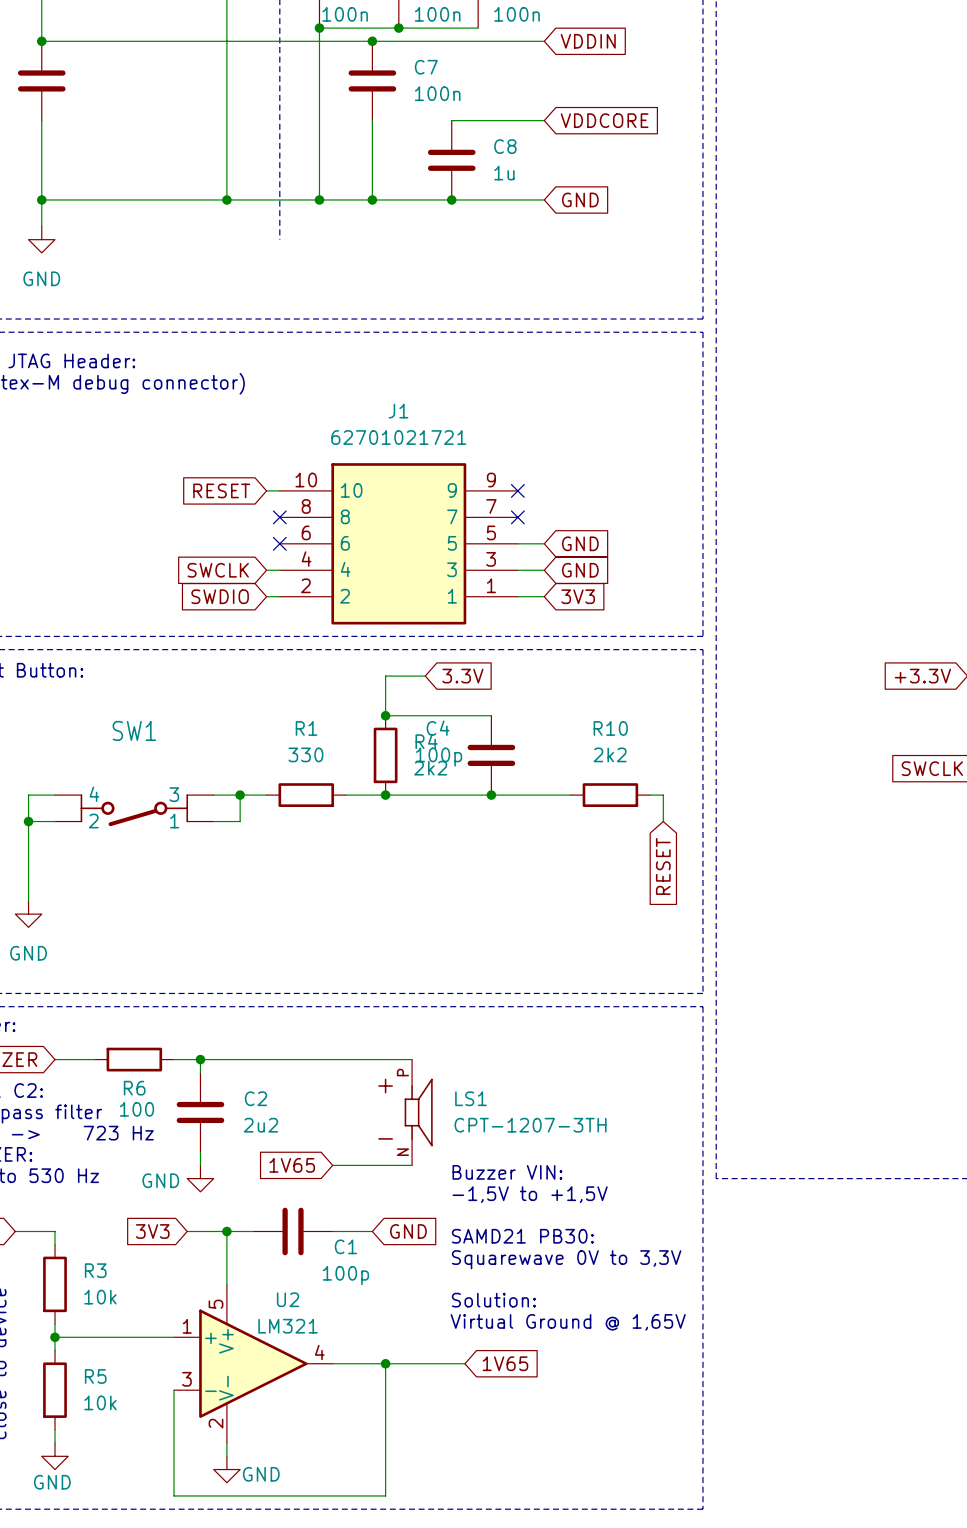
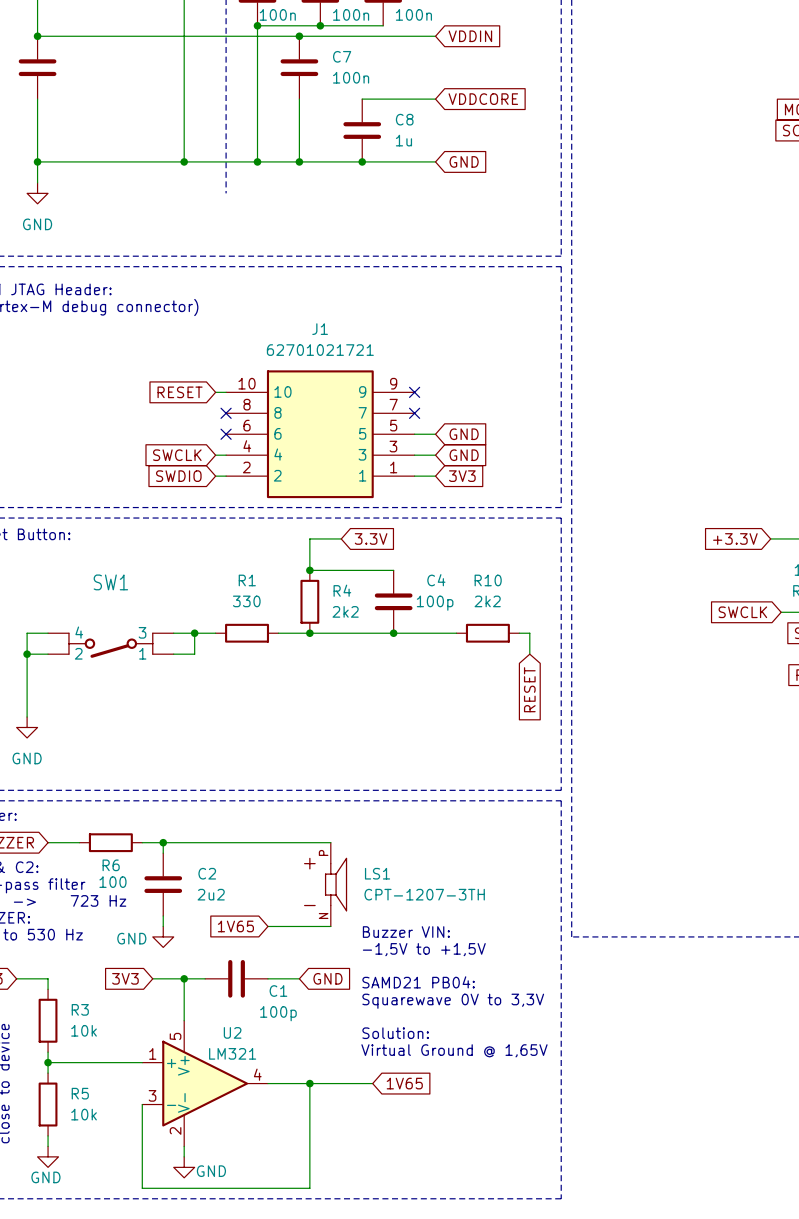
C4 name position: C4 (438, 728) -> C4 (436, 580)
C4 value position: 100p (439, 757) -> 100p (435, 603)
text: SAMD21 PB30: (522, 1236) -> SAMD21 PB04: (418, 982)

